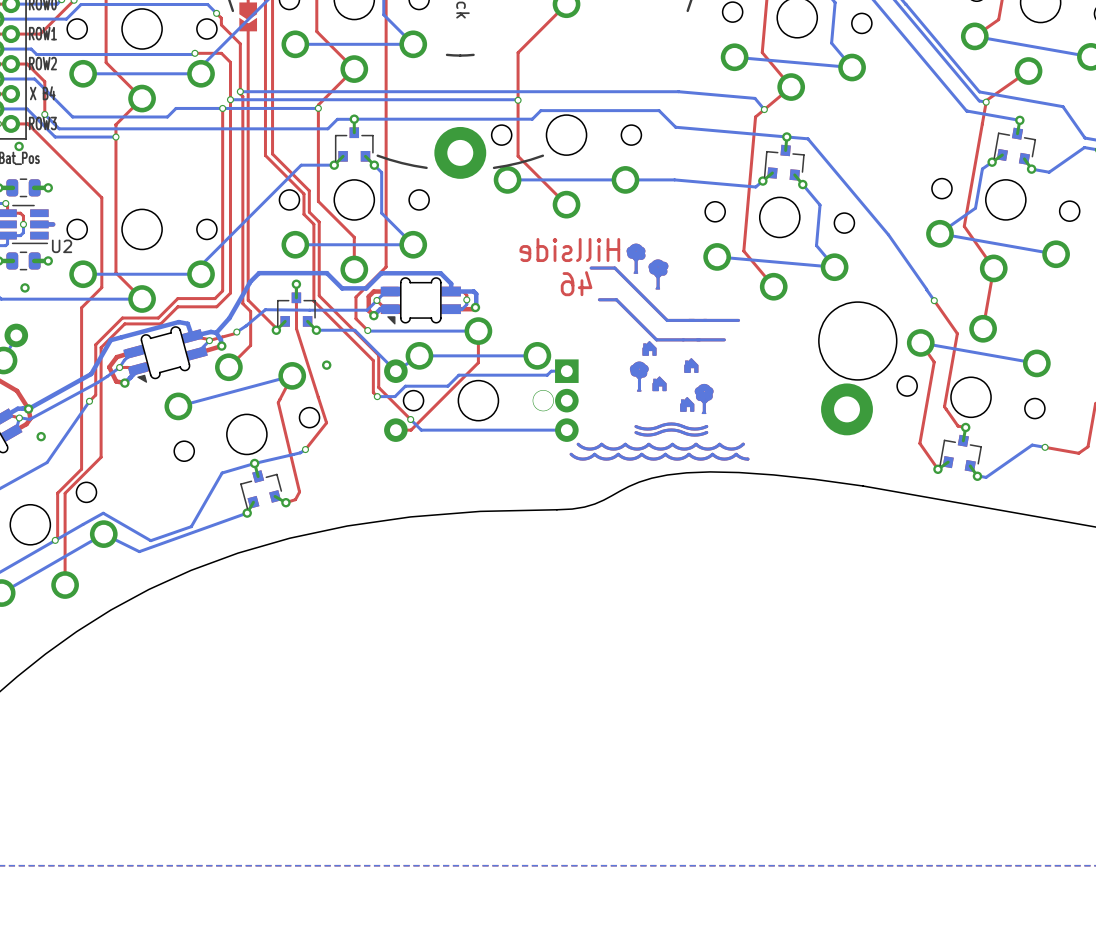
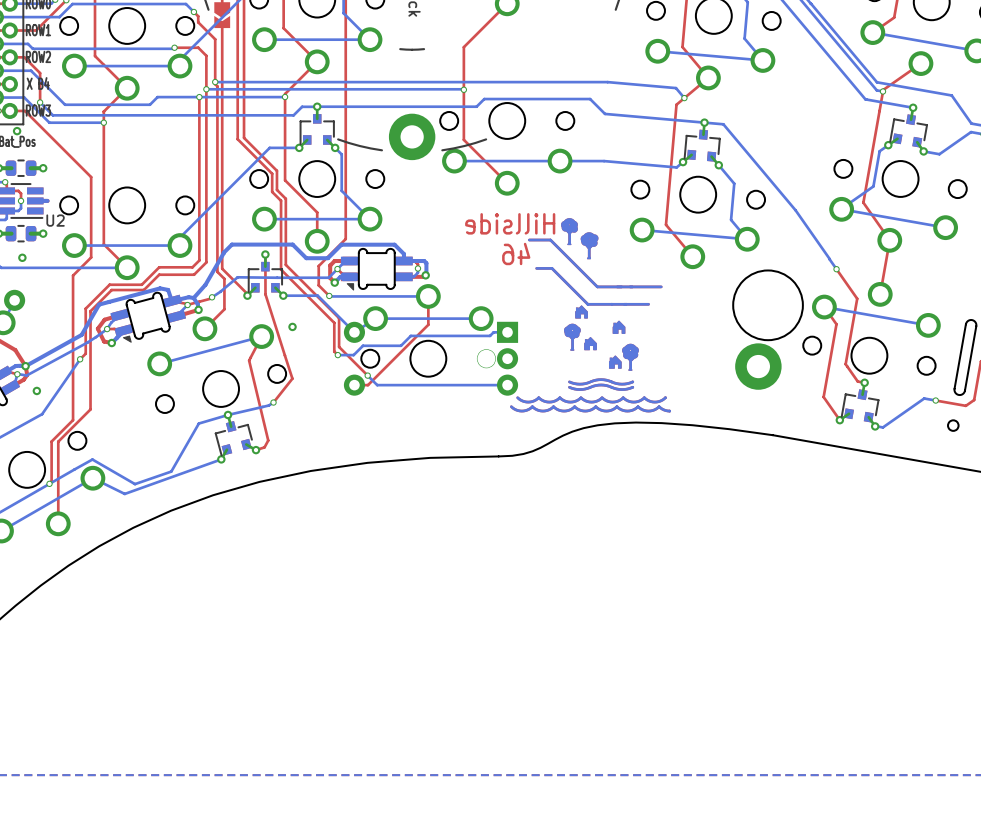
board edge: none -> (965, 324) (954, 389) (956, 393) (959, 395) (964, 391) (976, 325) (972, 320) (968, 320) (965, 324)
part: none -> (953, 425)

